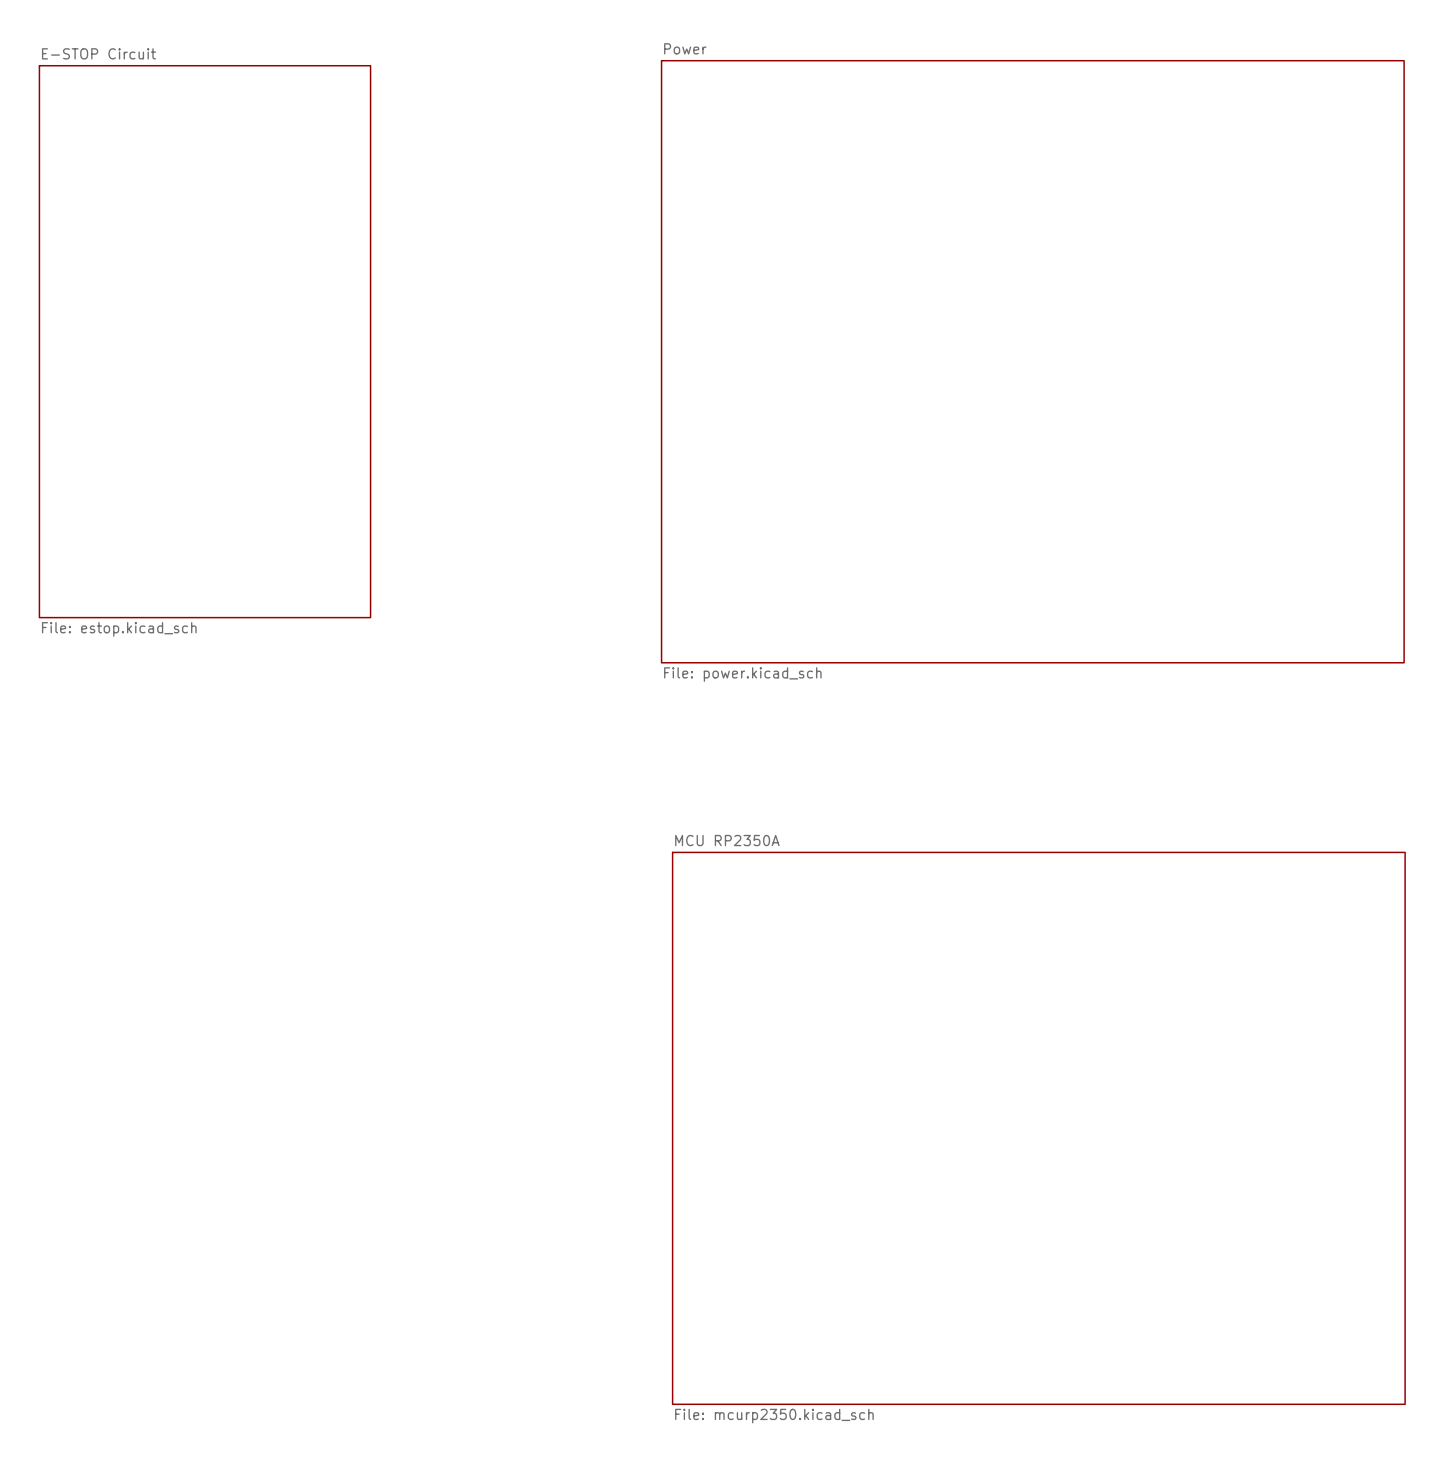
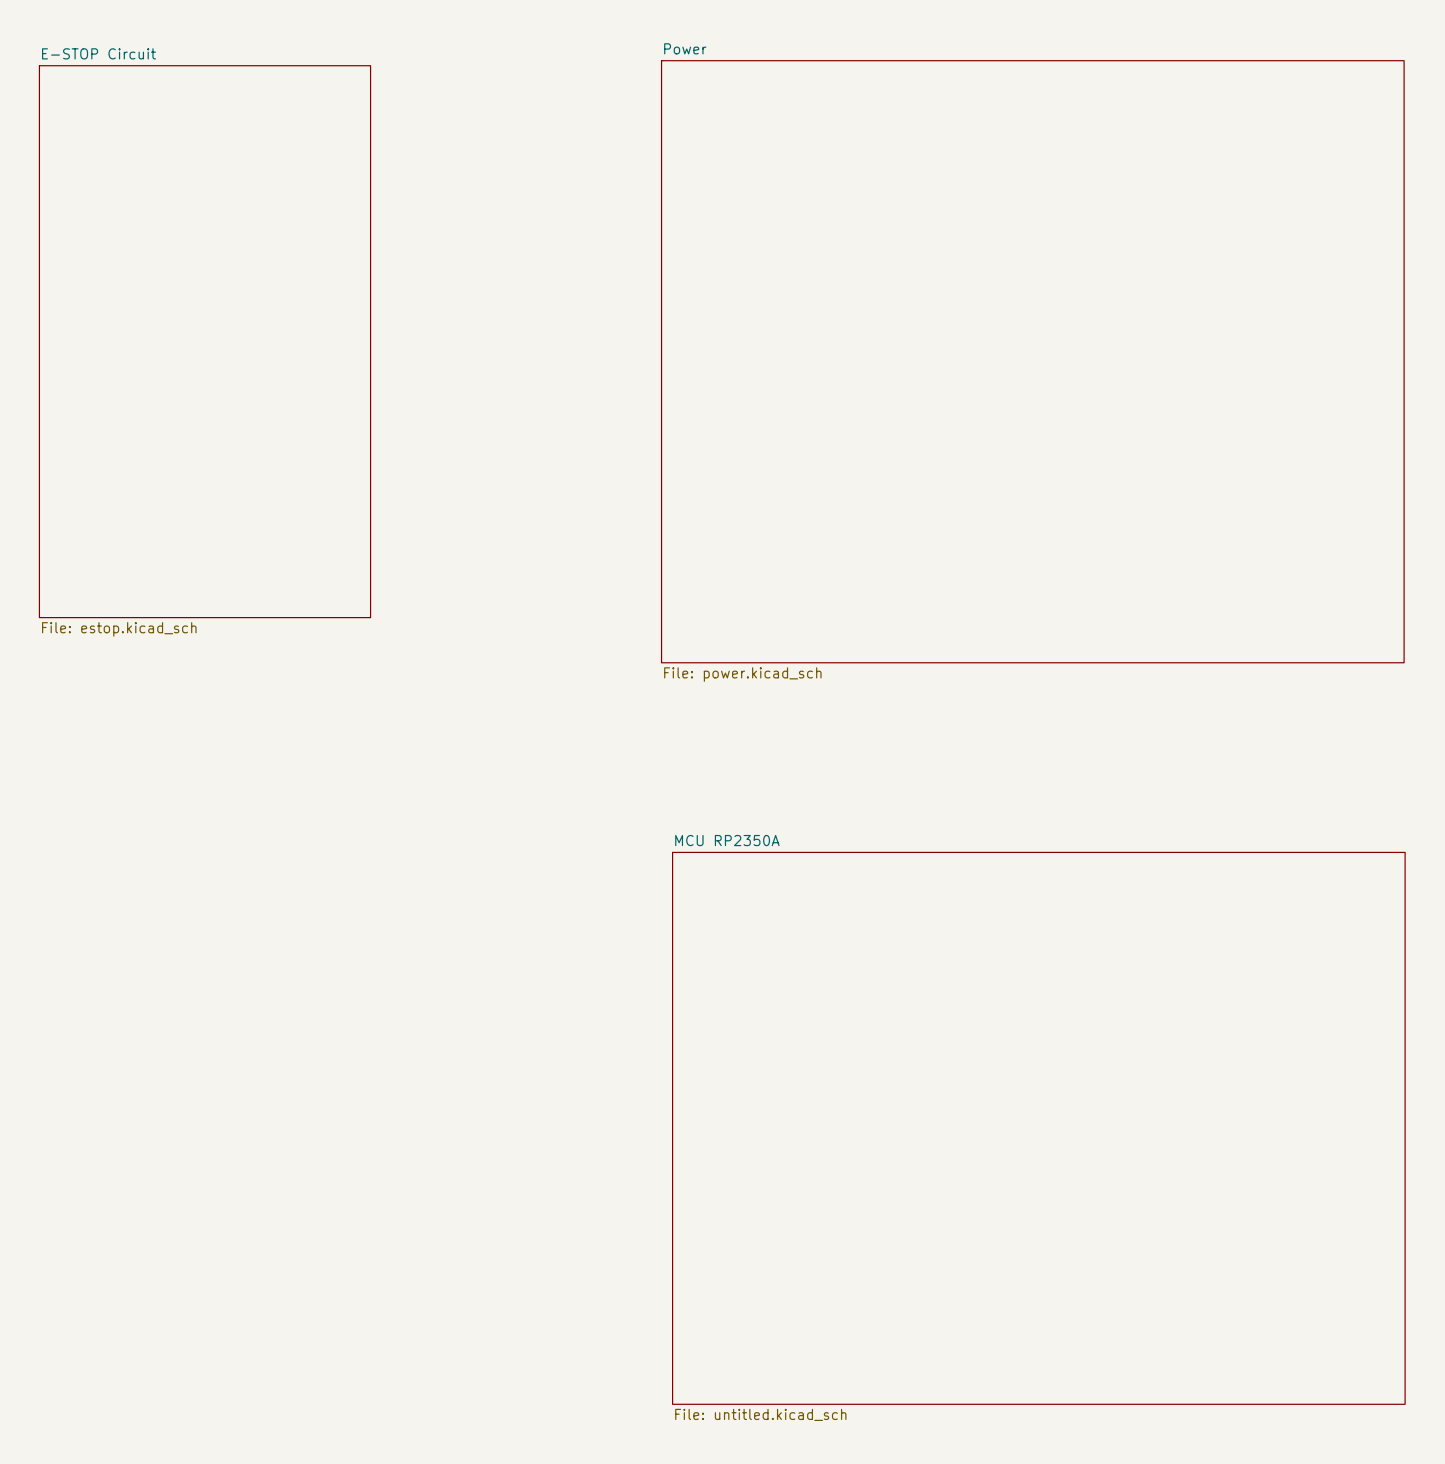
sheet MCU RP2350A value: File: mcurp2350.kicad_sch (774, 1416) -> File: untitled.kicad_sch (760, 1414)

